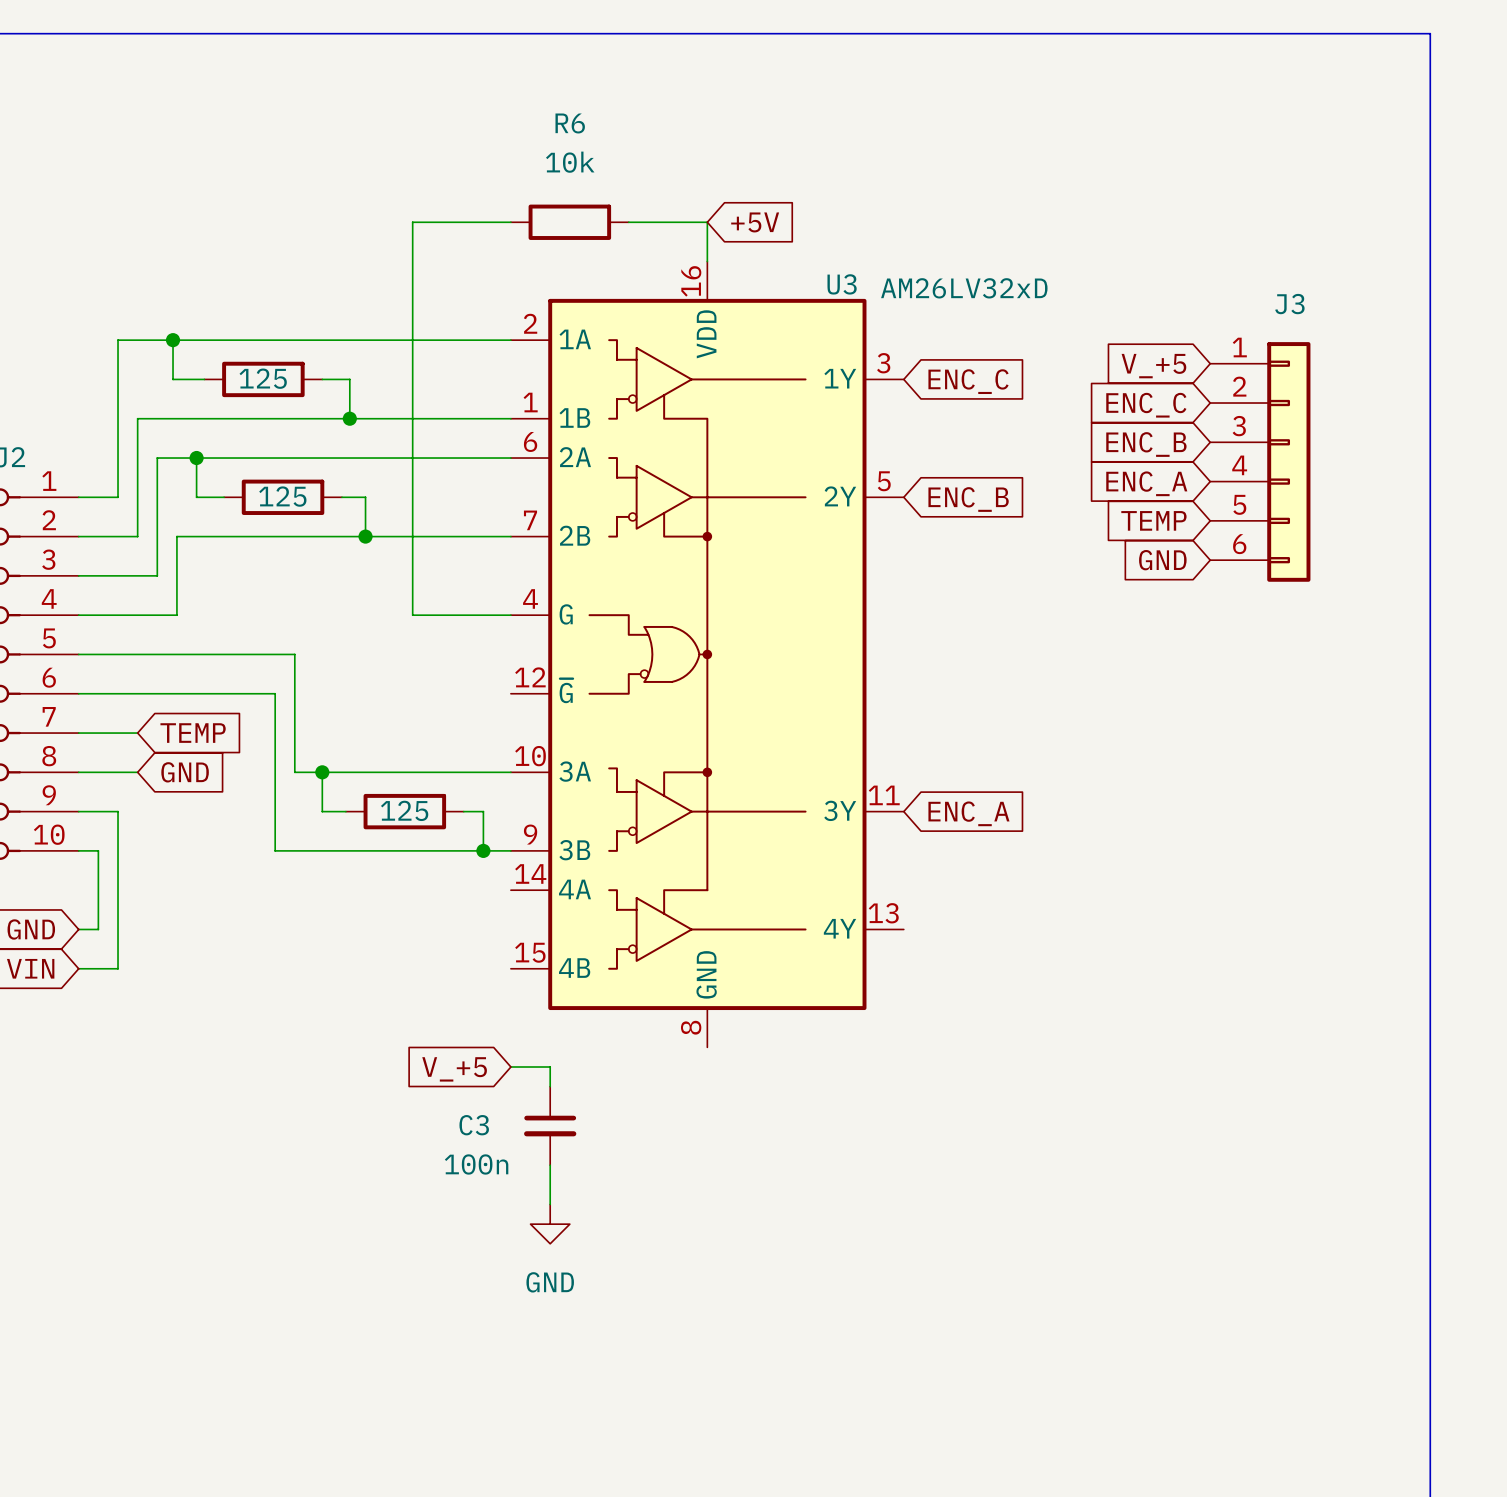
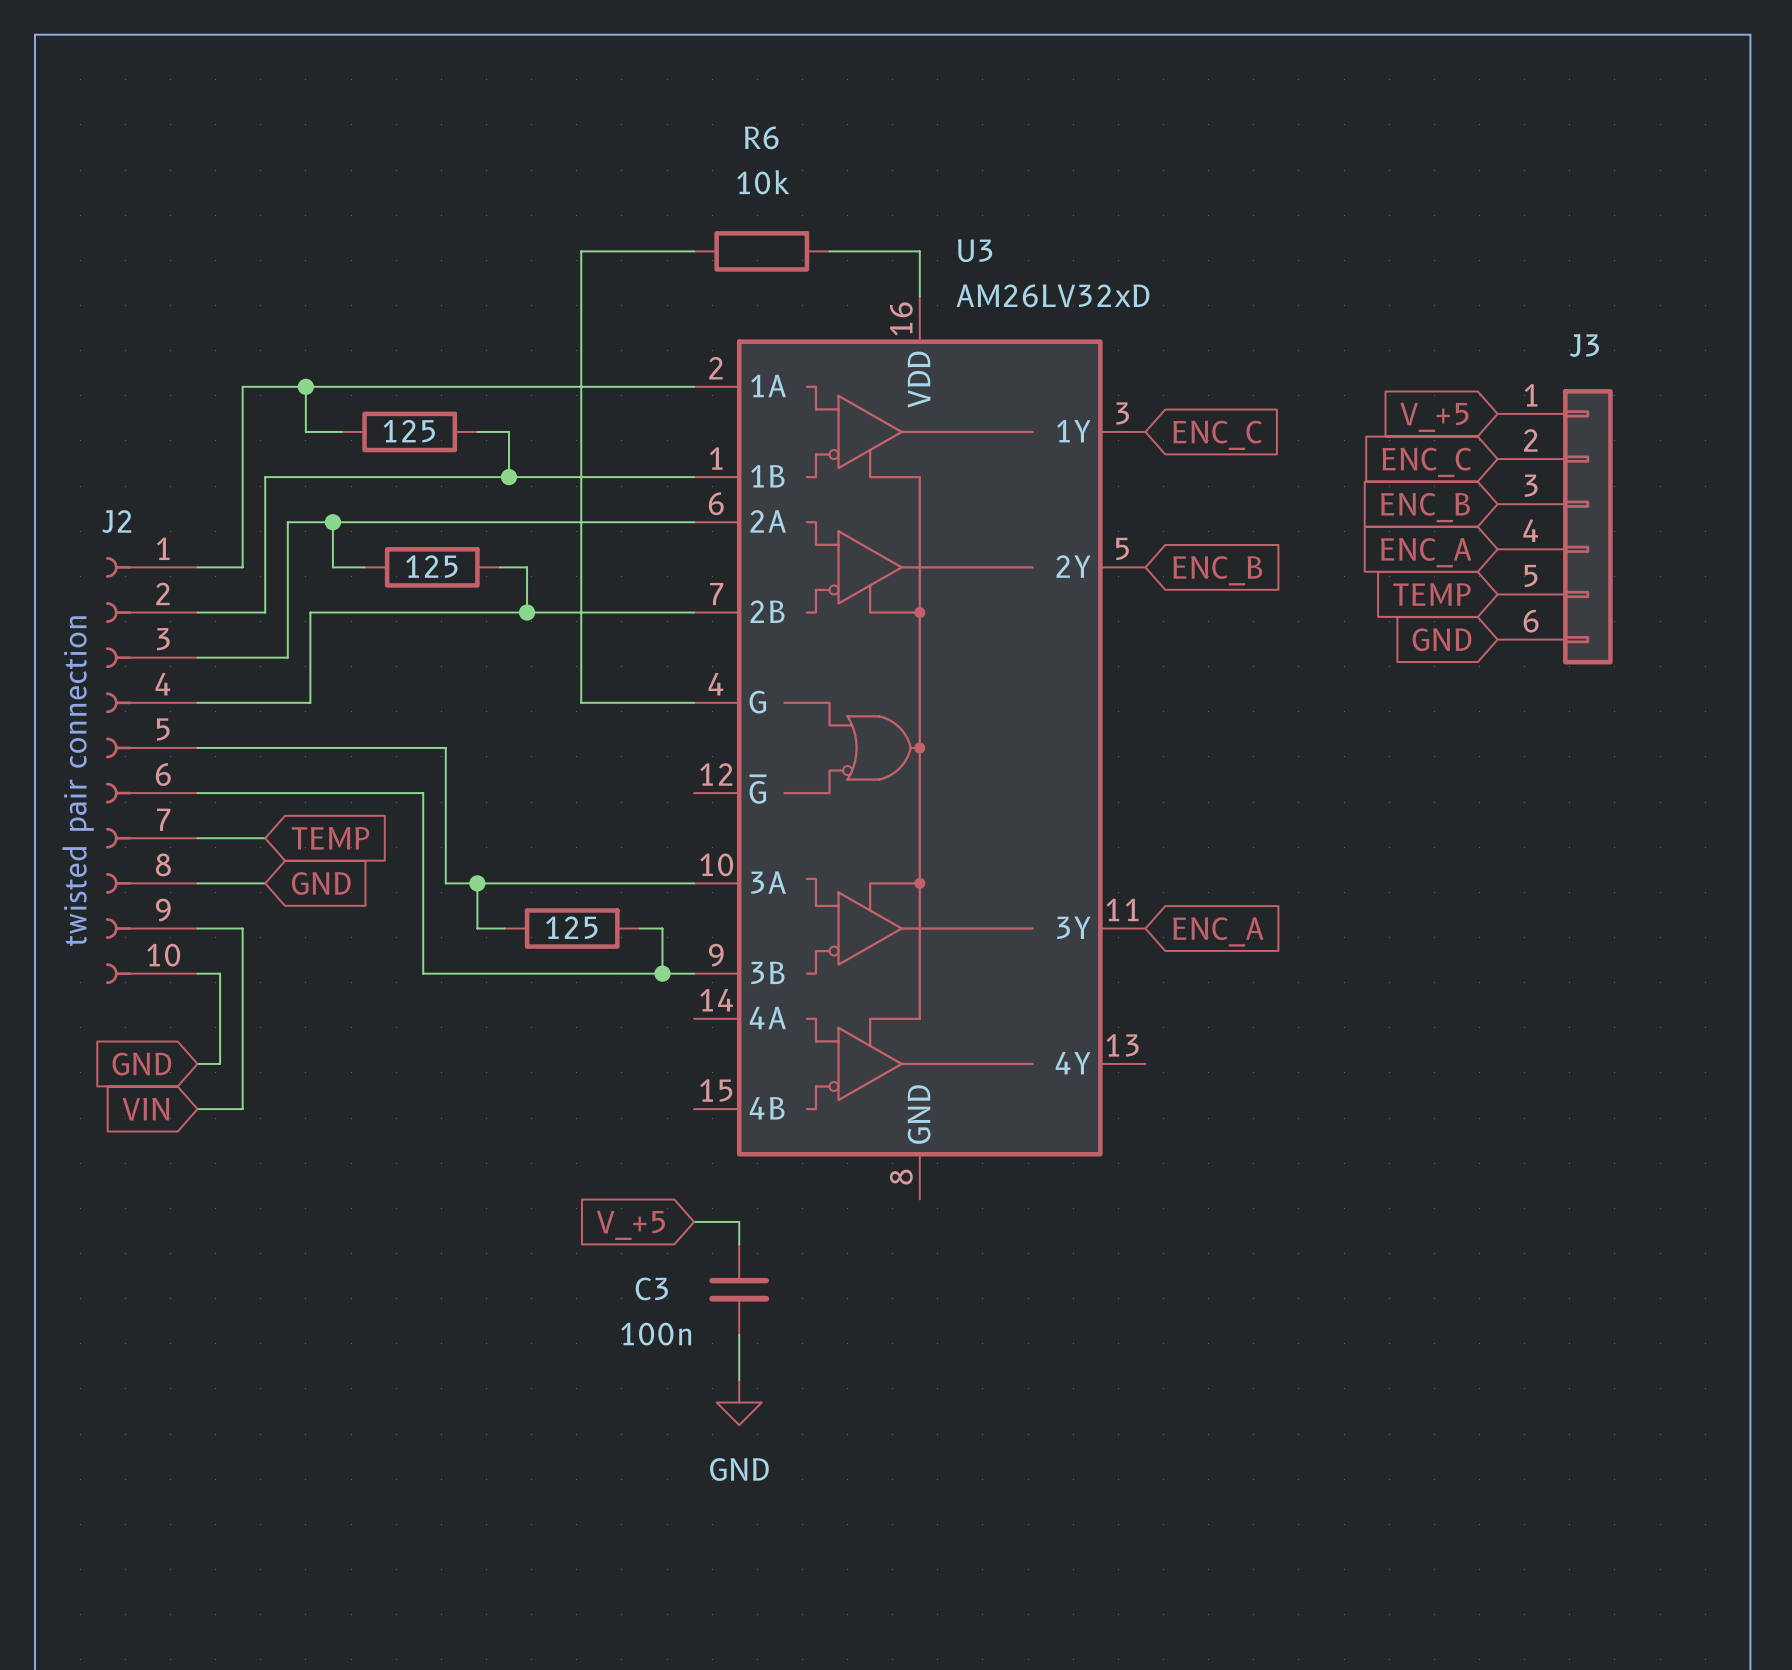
global label: +5V (755, 222) -> none
U3 name position: U3 (842, 284) -> U3 (975, 250)
U3 value position: AM26LV32xD (964, 288) -> AM26LV32xD (1052, 295)

